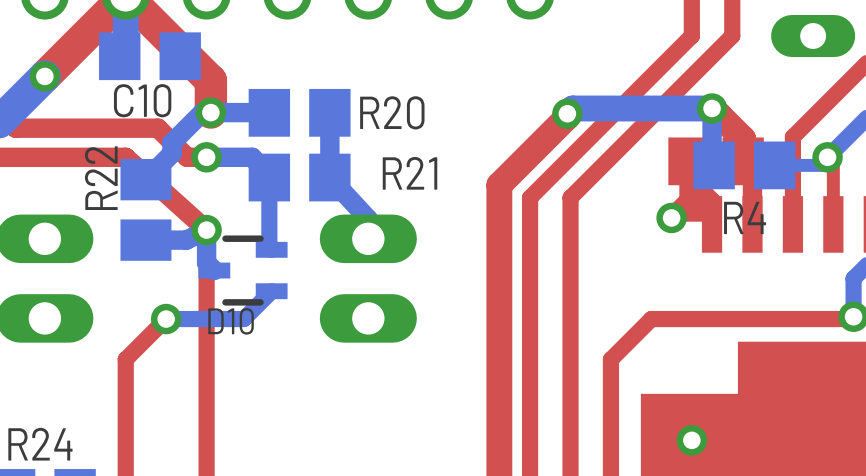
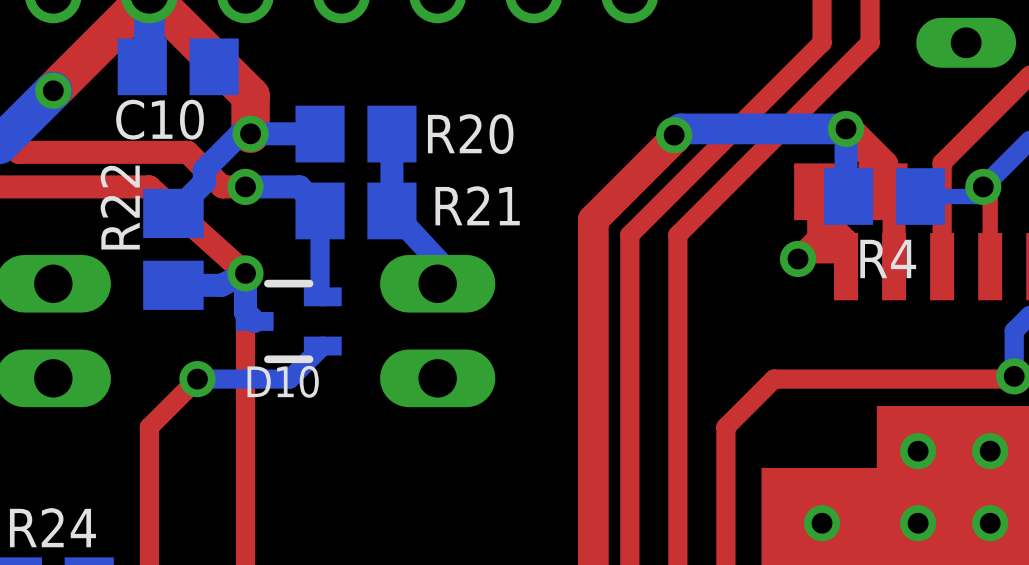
via: none -> (918, 451)
via: none -> (990, 451)
via: none -> (918, 523)
via: none -> (990, 523)

